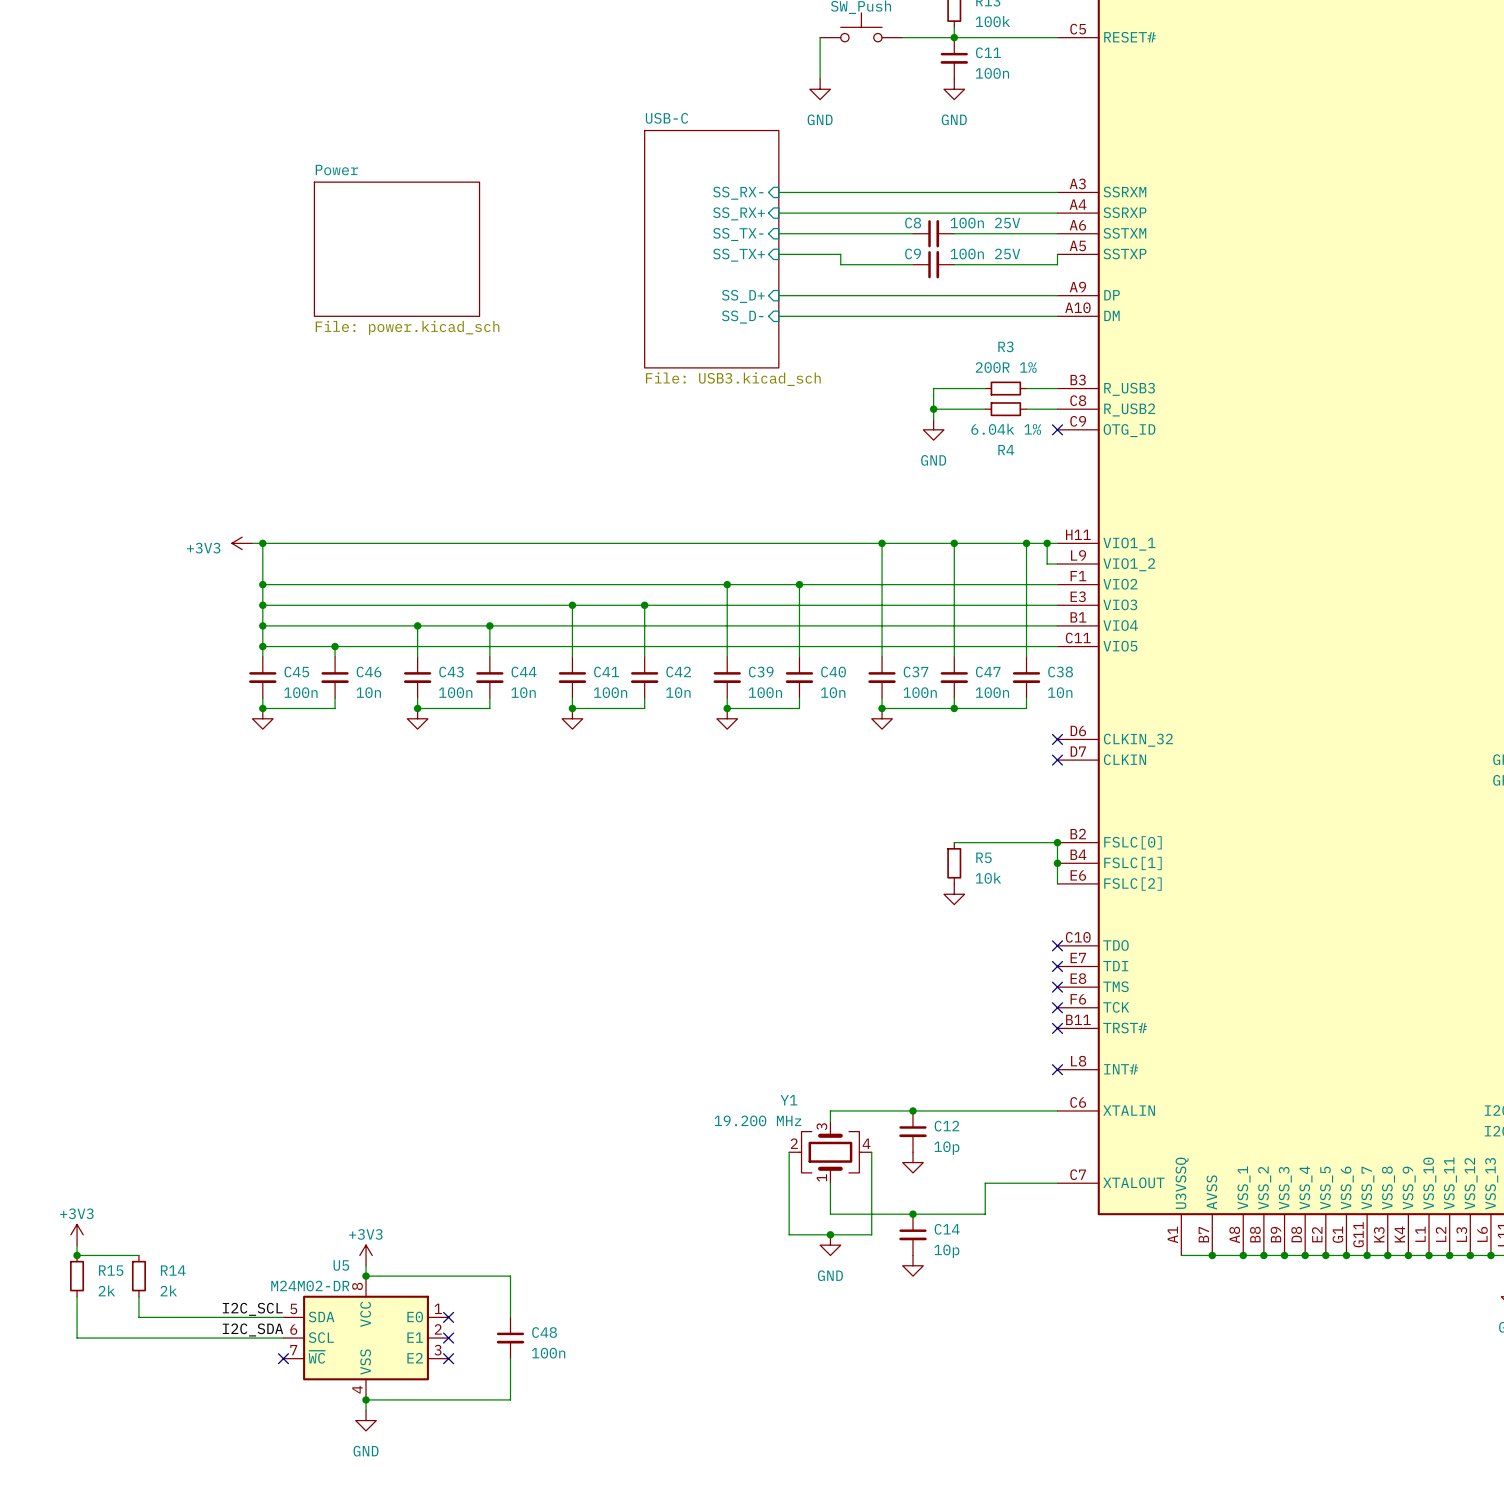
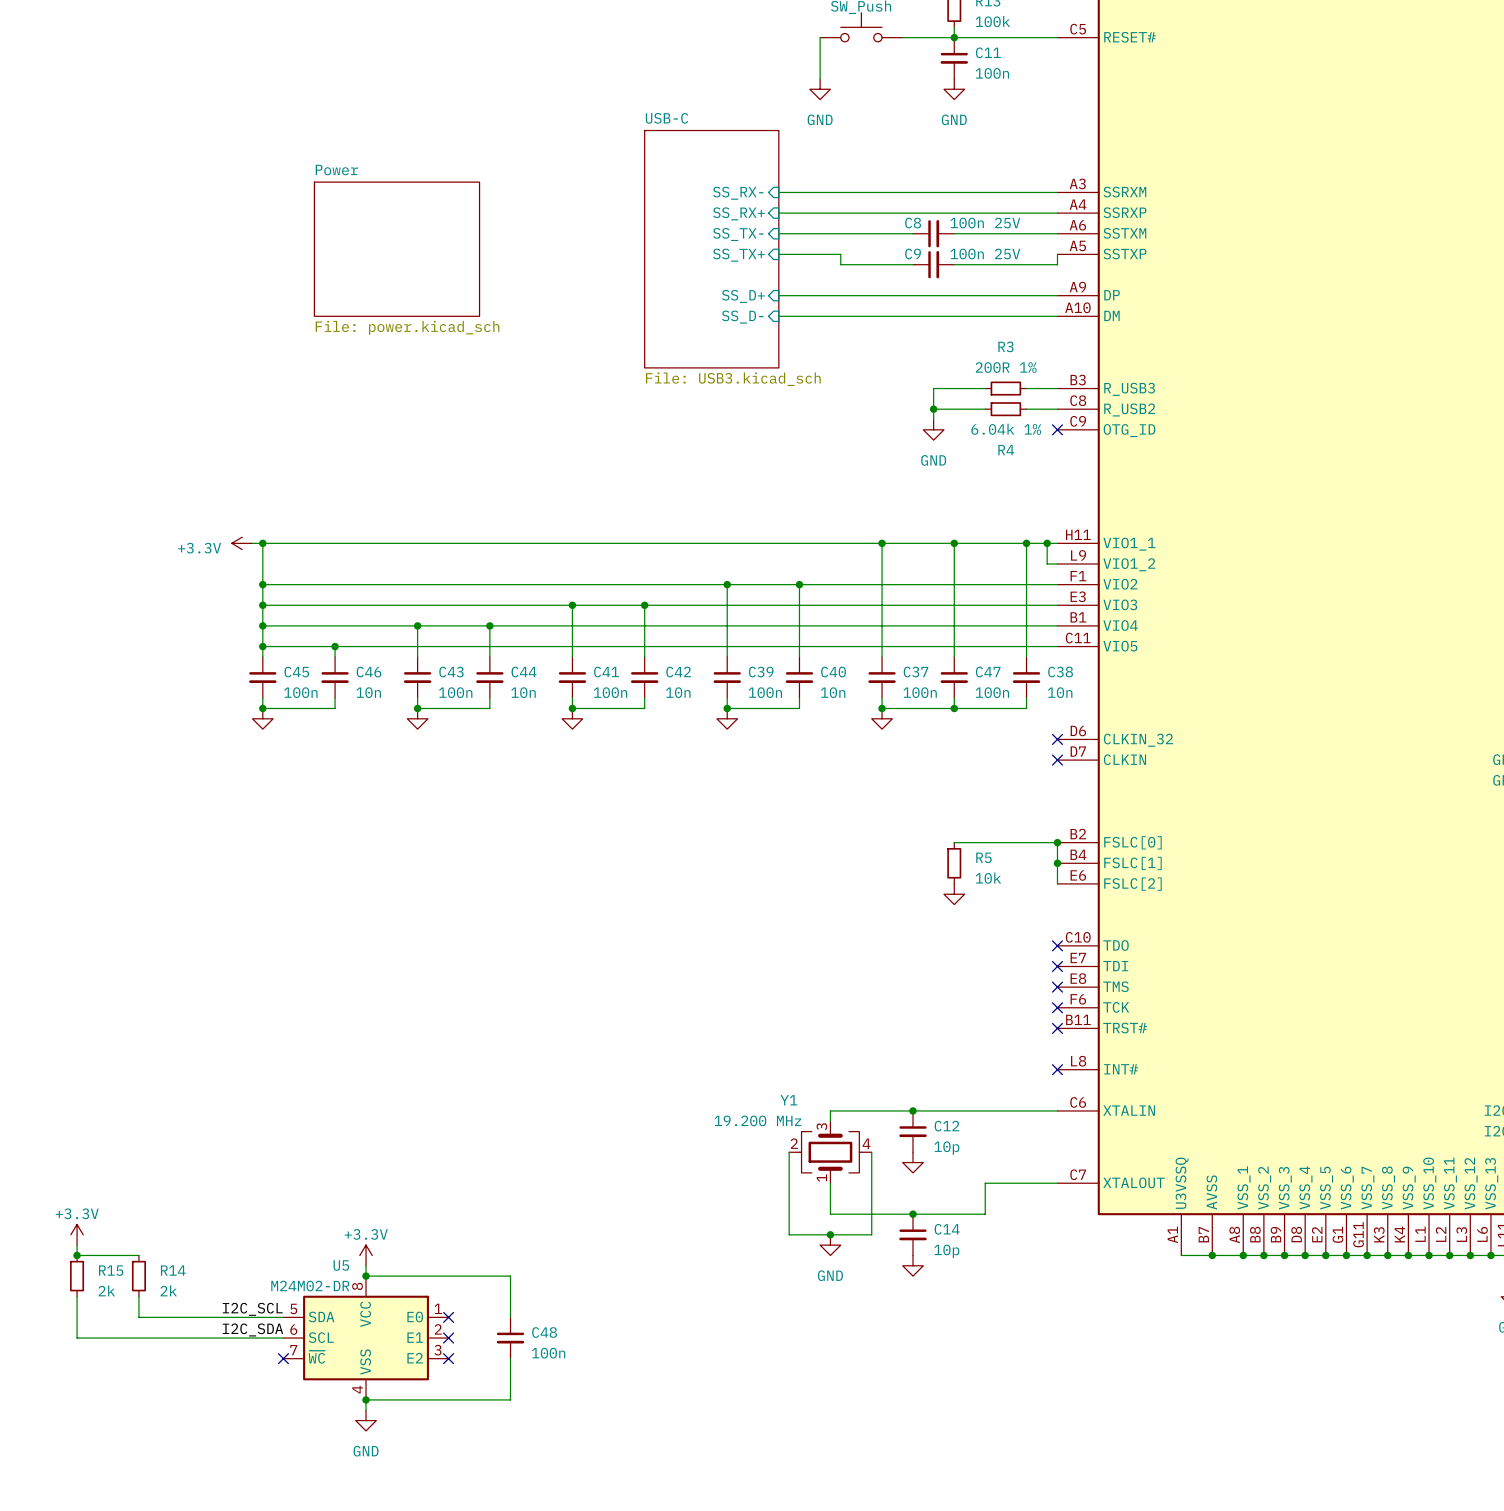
power symbol: +3V3 (242, 543) -> +3.3V (242, 543)
power symbol: +3V3 (77, 1234) -> +3.3V (77, 1234)
power symbol: +3V3 (366, 1255) -> +3.3V (366, 1255)

